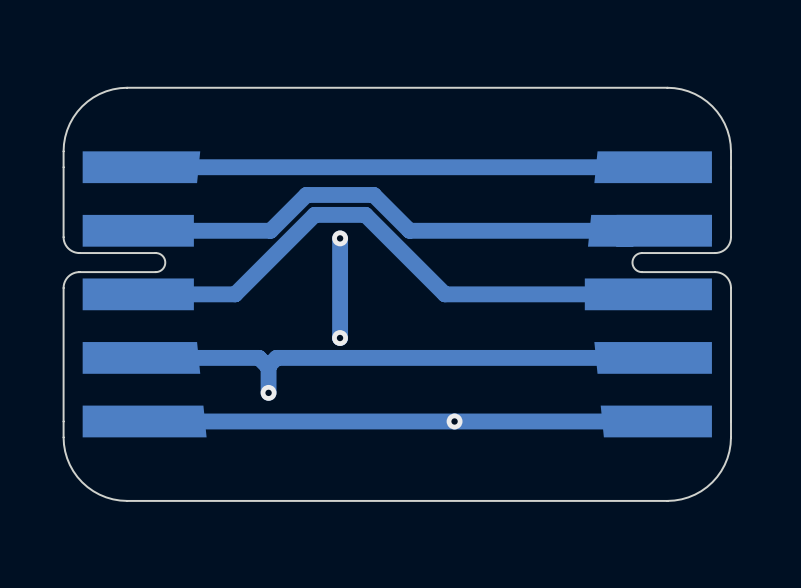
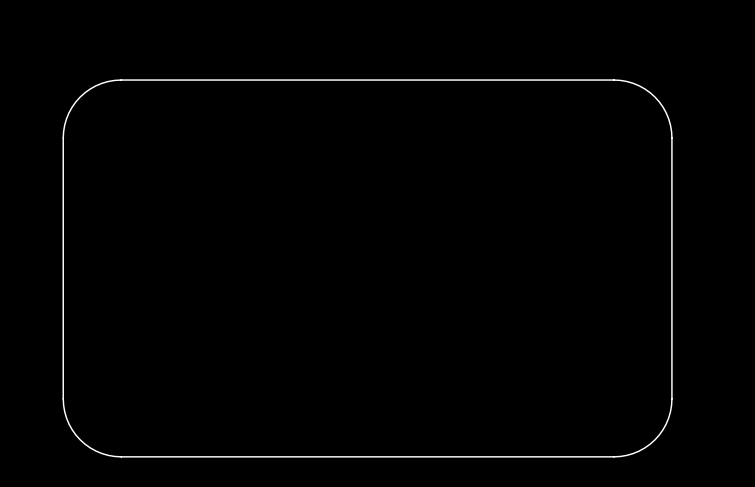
board edge: none -> (63, 152) (63, 384)
track: (654, 167) (139, 167) -> none
board edge: none -> (671, 152) (671, 384)
track: (664, 230) (409, 230) (373, 194) (306, 194) (270, 230) (138, 230) -> none
track: (340, 238) (340, 337) -> none
via: (340, 238) -> none
part: (134, 294) -> none
track: (648, 294) (444, 294) (365, 214) (314, 214) (235, 294) (138, 294) -> none
part: (658, 294) -> none
via: (340, 338) -> none
track: (139, 357) (259, 357) (268, 367) (268, 392) -> none
track: (654, 357) (276, 357) (268, 365) -> none
via: (268, 392) -> none
via: (454, 421) -> none
track: (657, 421) (143, 421) -> none

